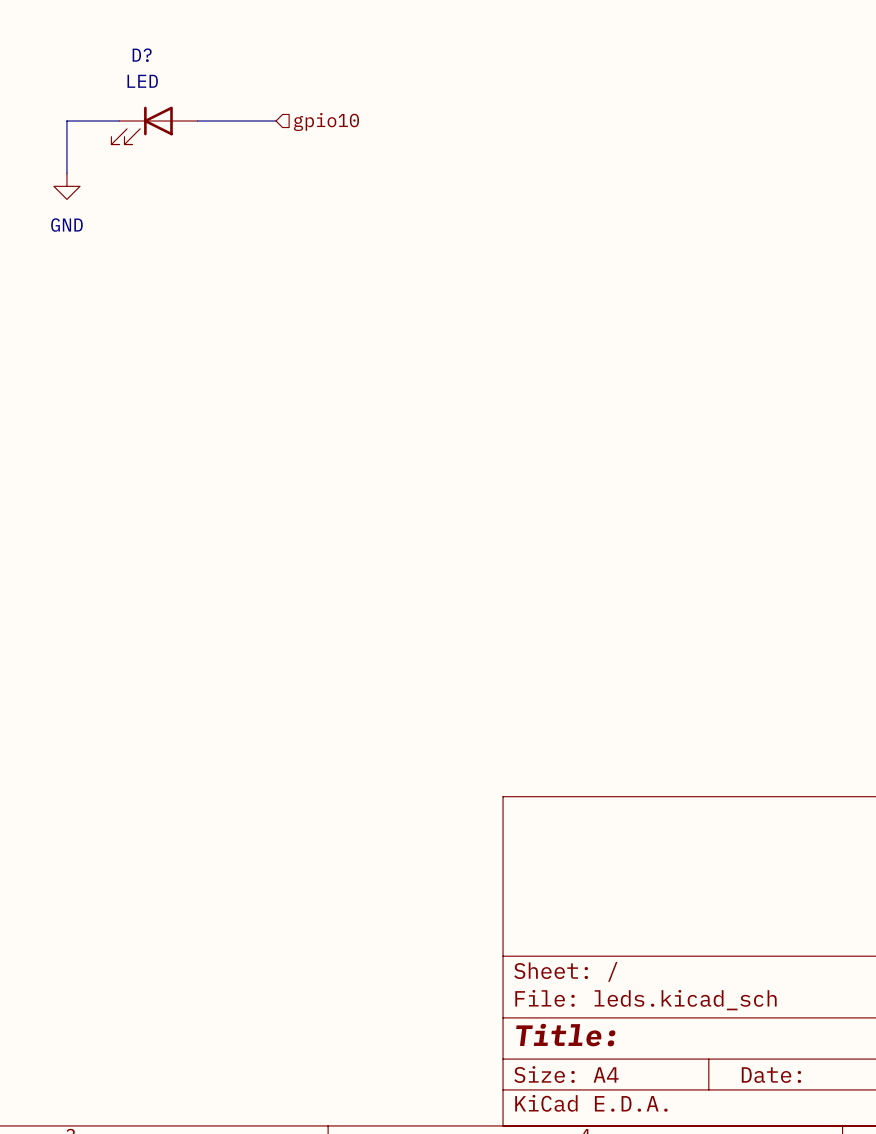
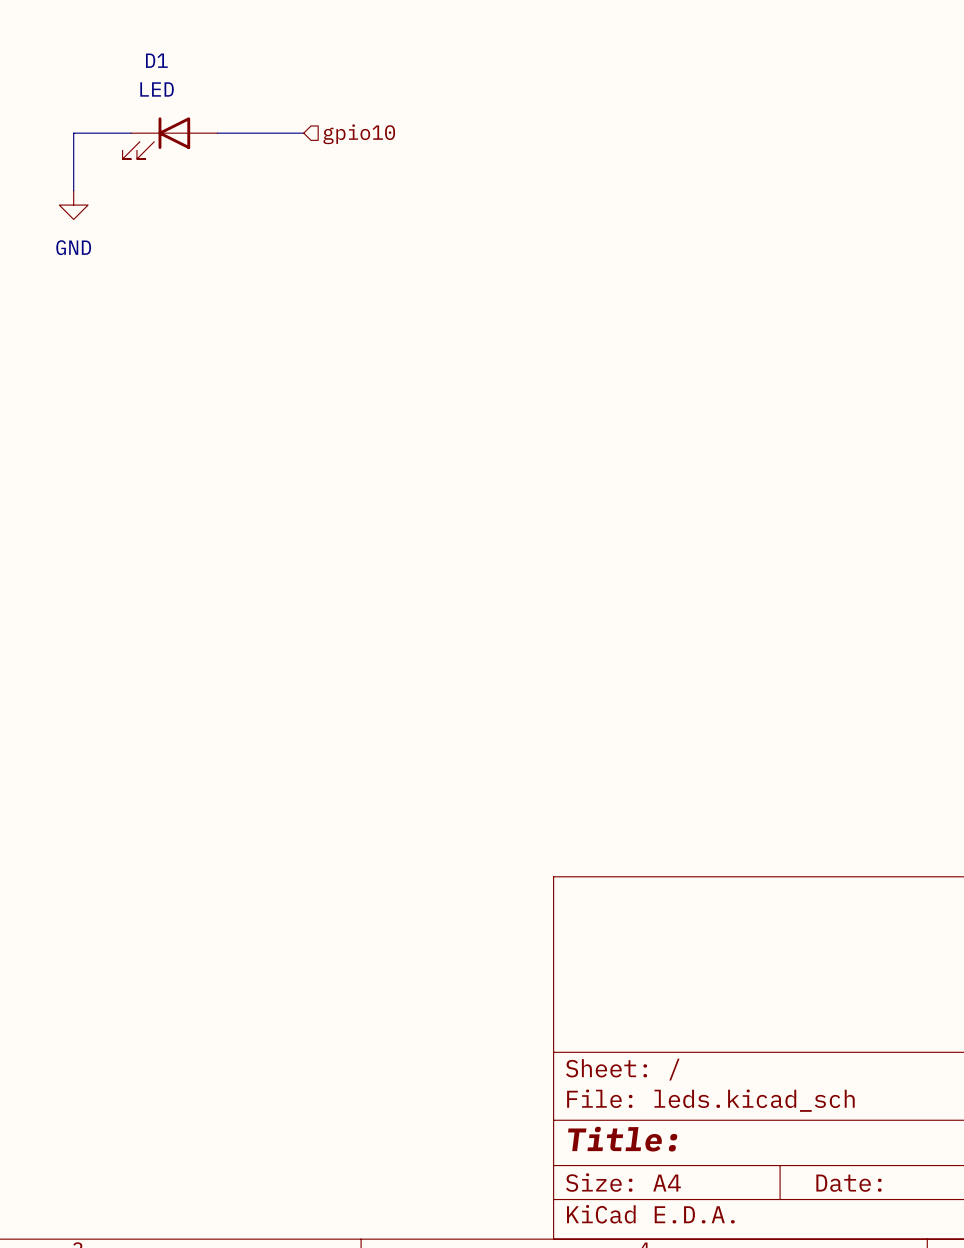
D? name: D? (142, 55) -> D1 (156, 60)

